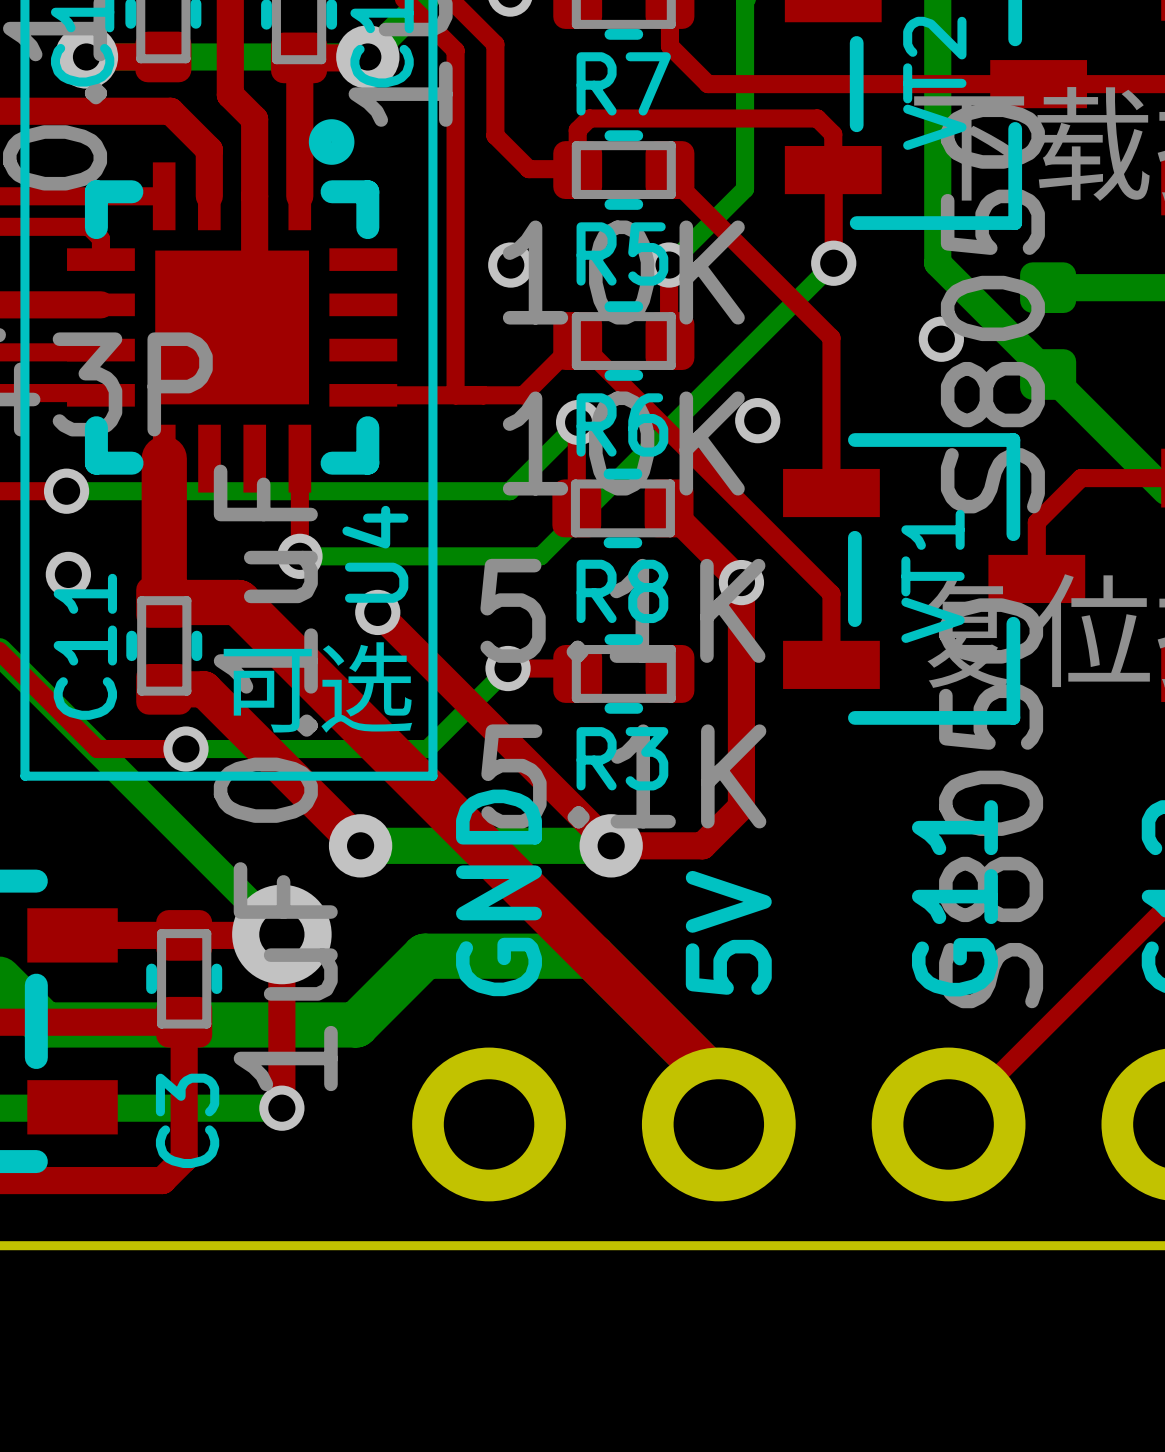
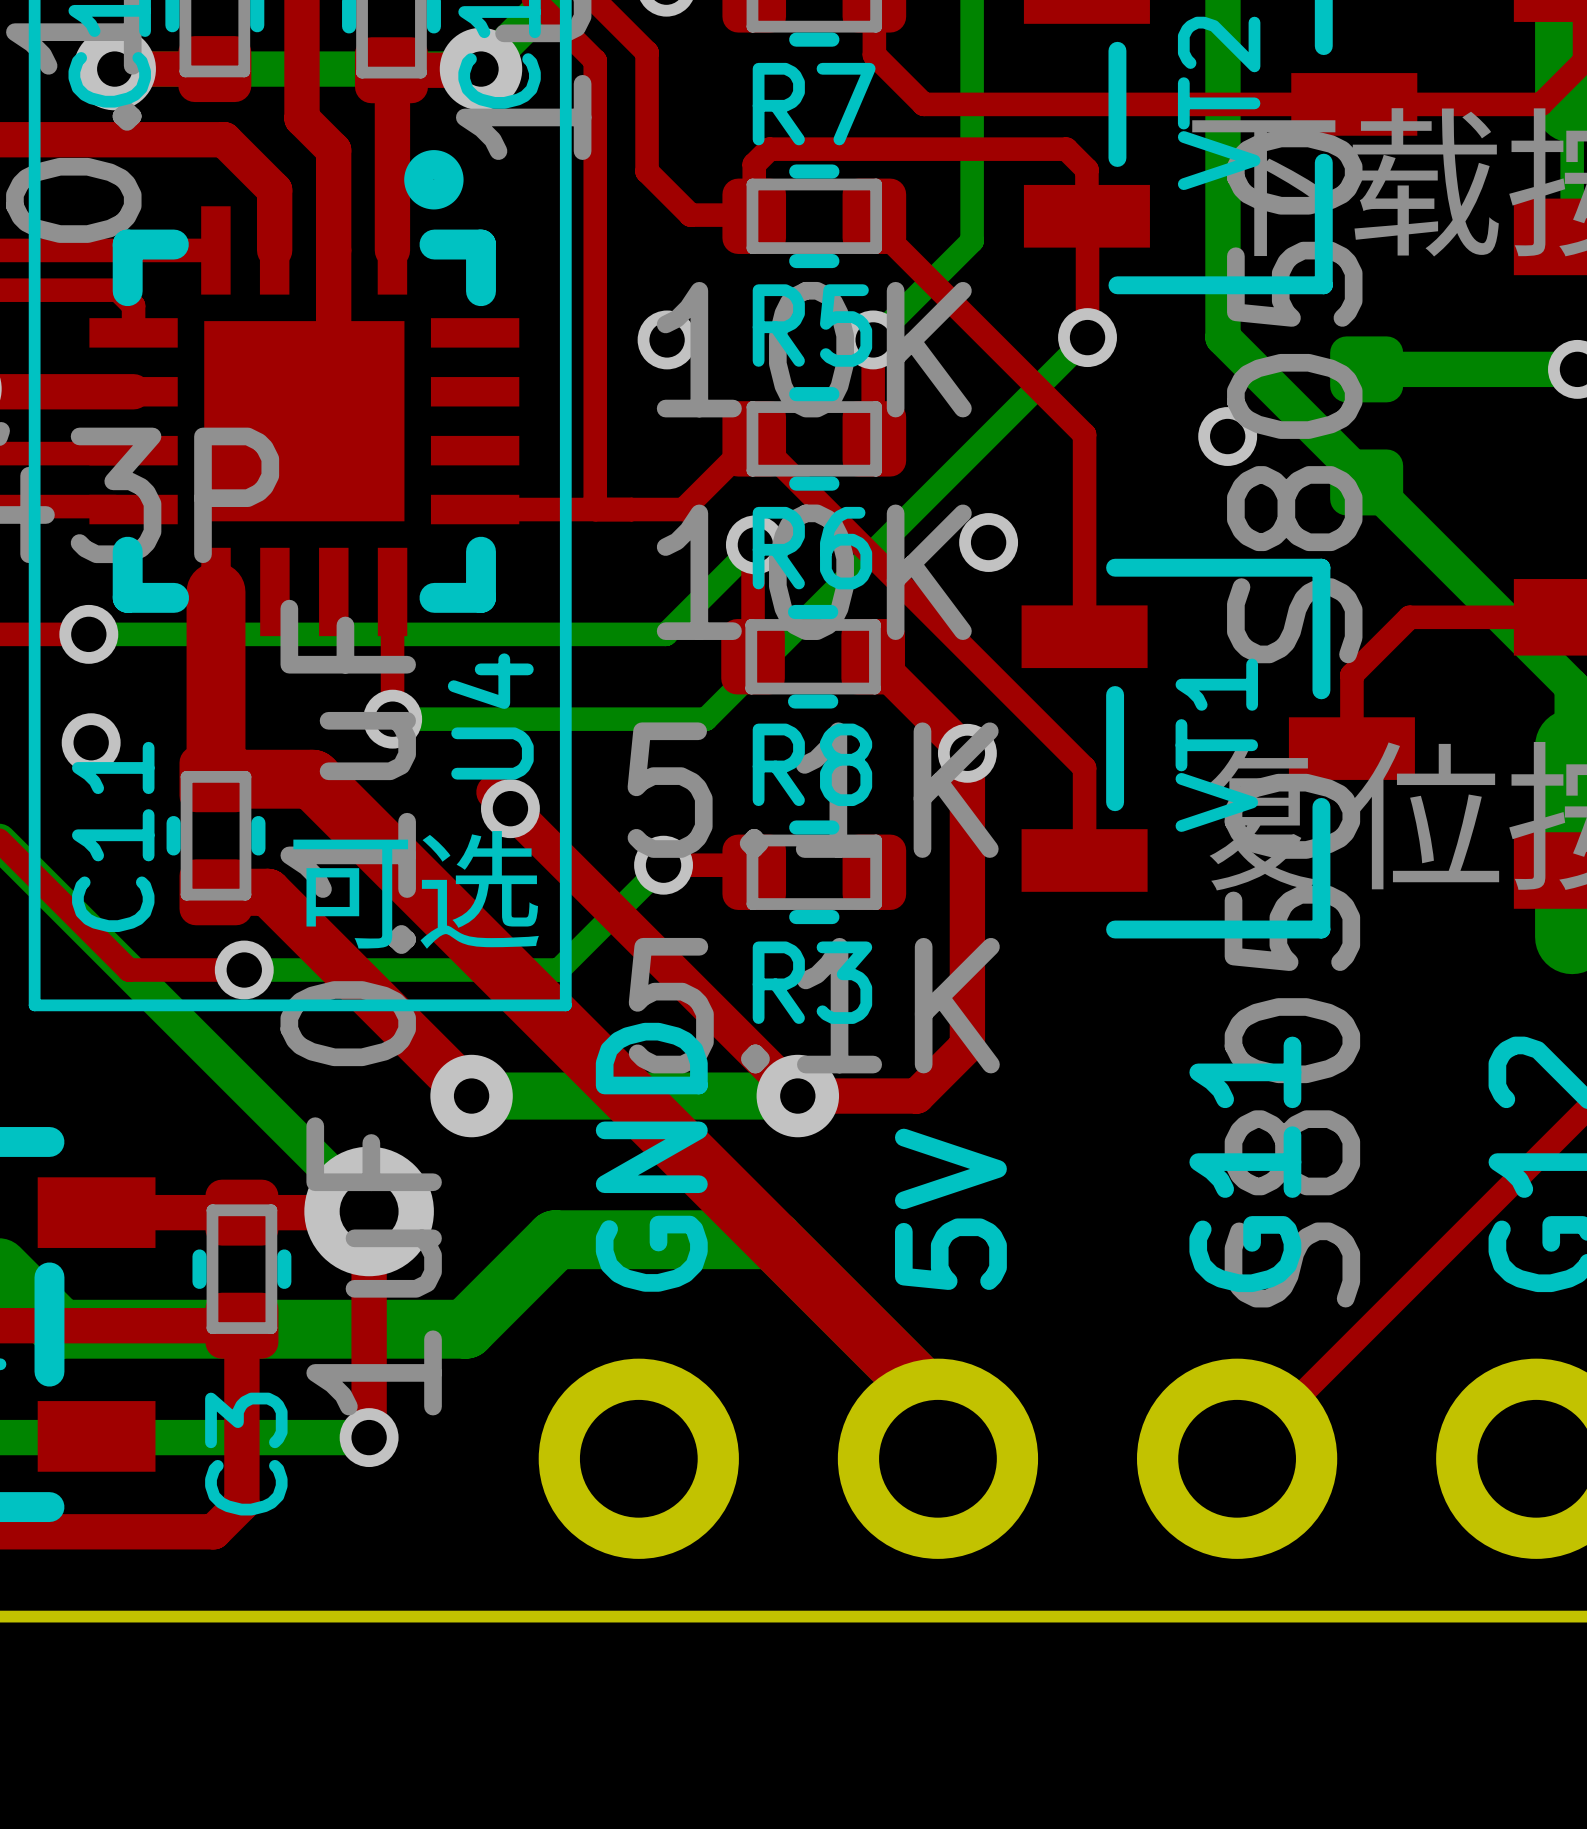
via position: (377, 612) -> (510, 808)

